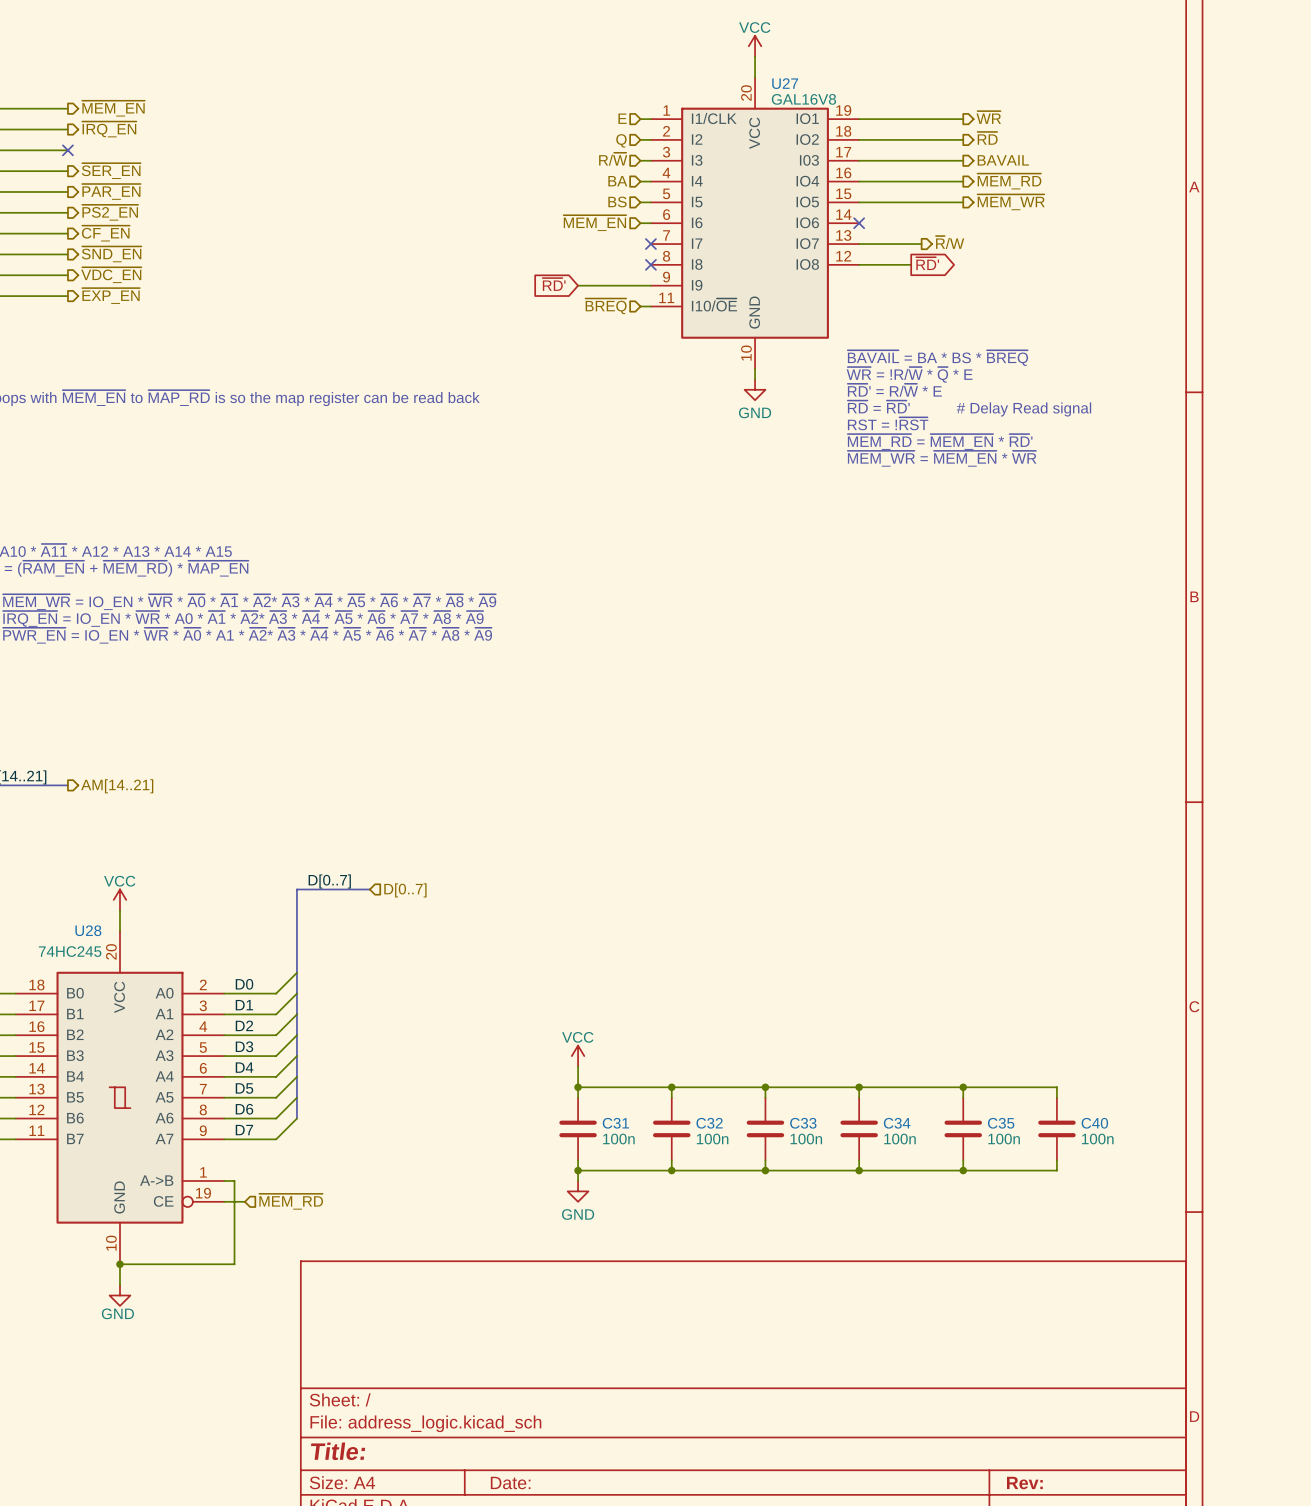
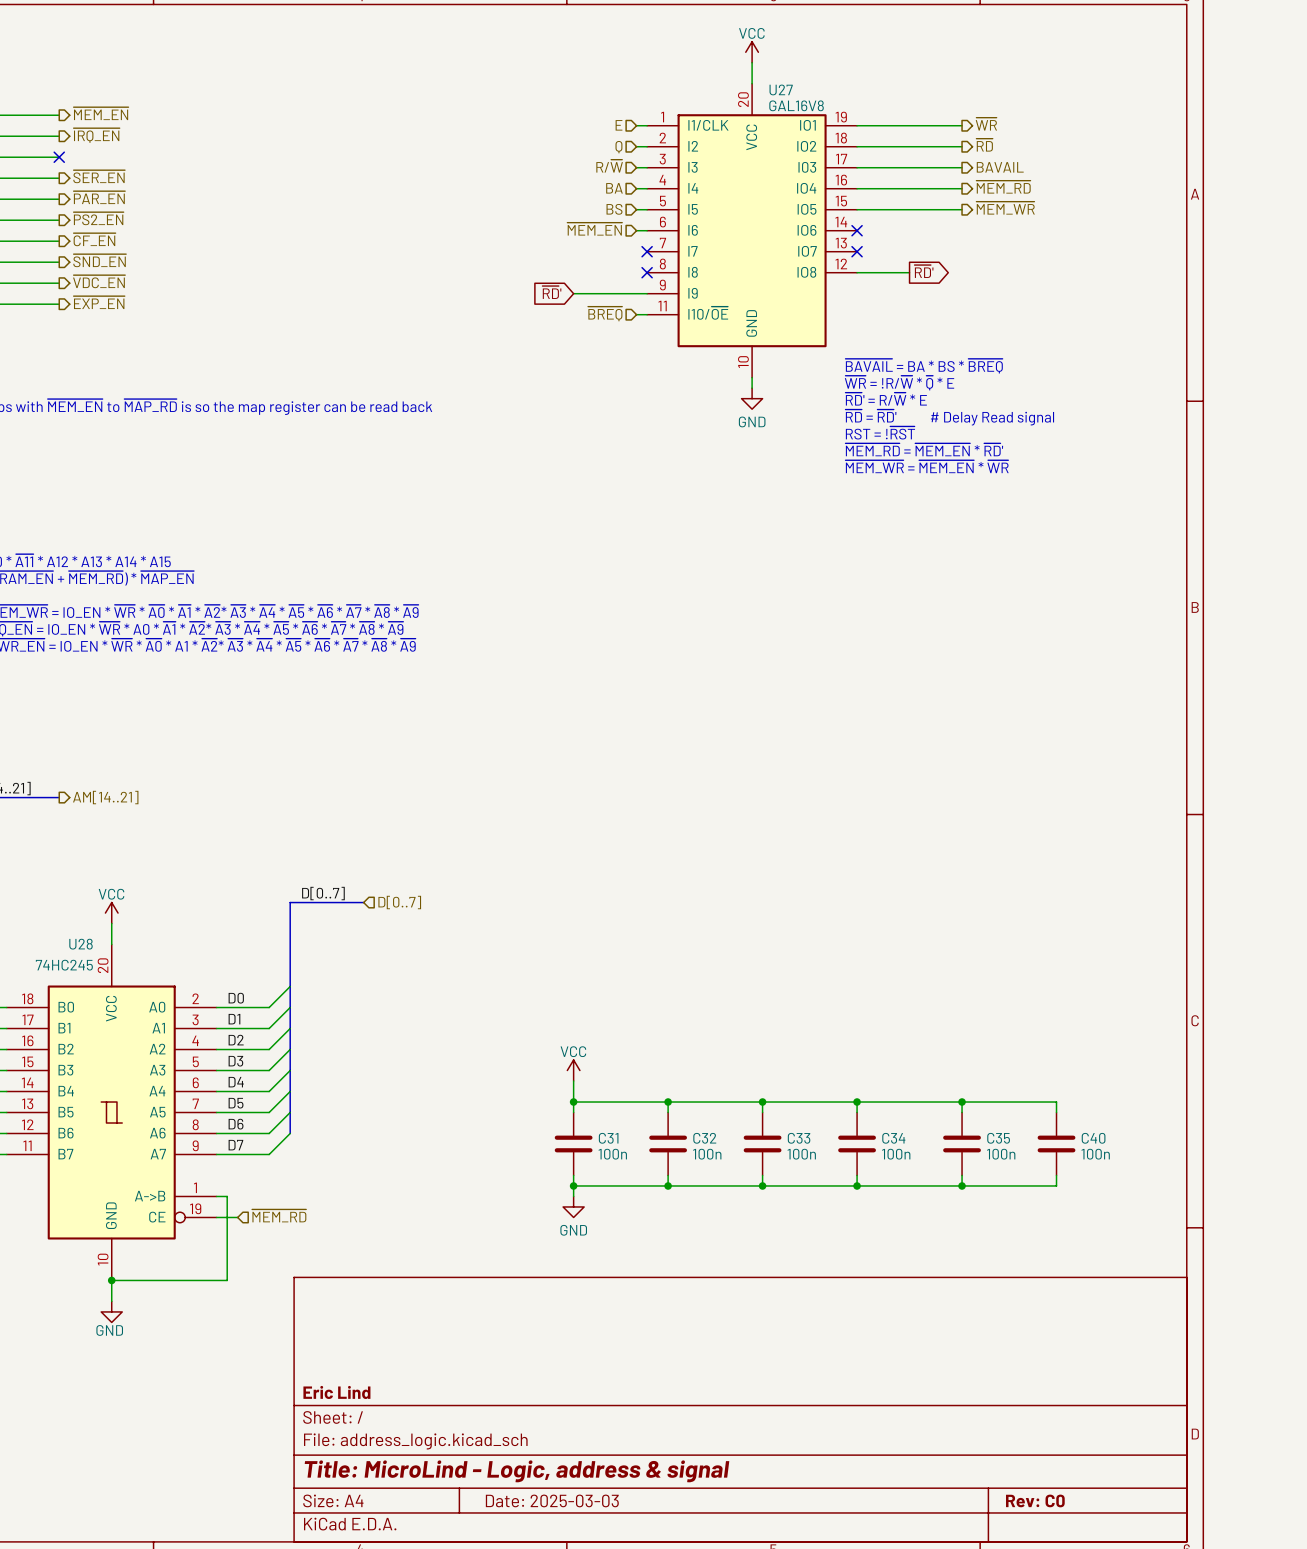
hierarchical label: ~{R}/W (950, 242) -> none
wire: (859, 244) (921, 244) -> none
no-connect mark: none -> (857, 251)
title block: none -> Eric Lind (336, 1392)
title block: Title: (338, 1451) -> Title: MicroLind - Logic, address & signal (517, 1471)
title block: Date: (510, 1483) -> Date: 2025-03-03 (552, 1500)
title block: Rev: (1024, 1483) -> Rev: C0 (1035, 1500)

